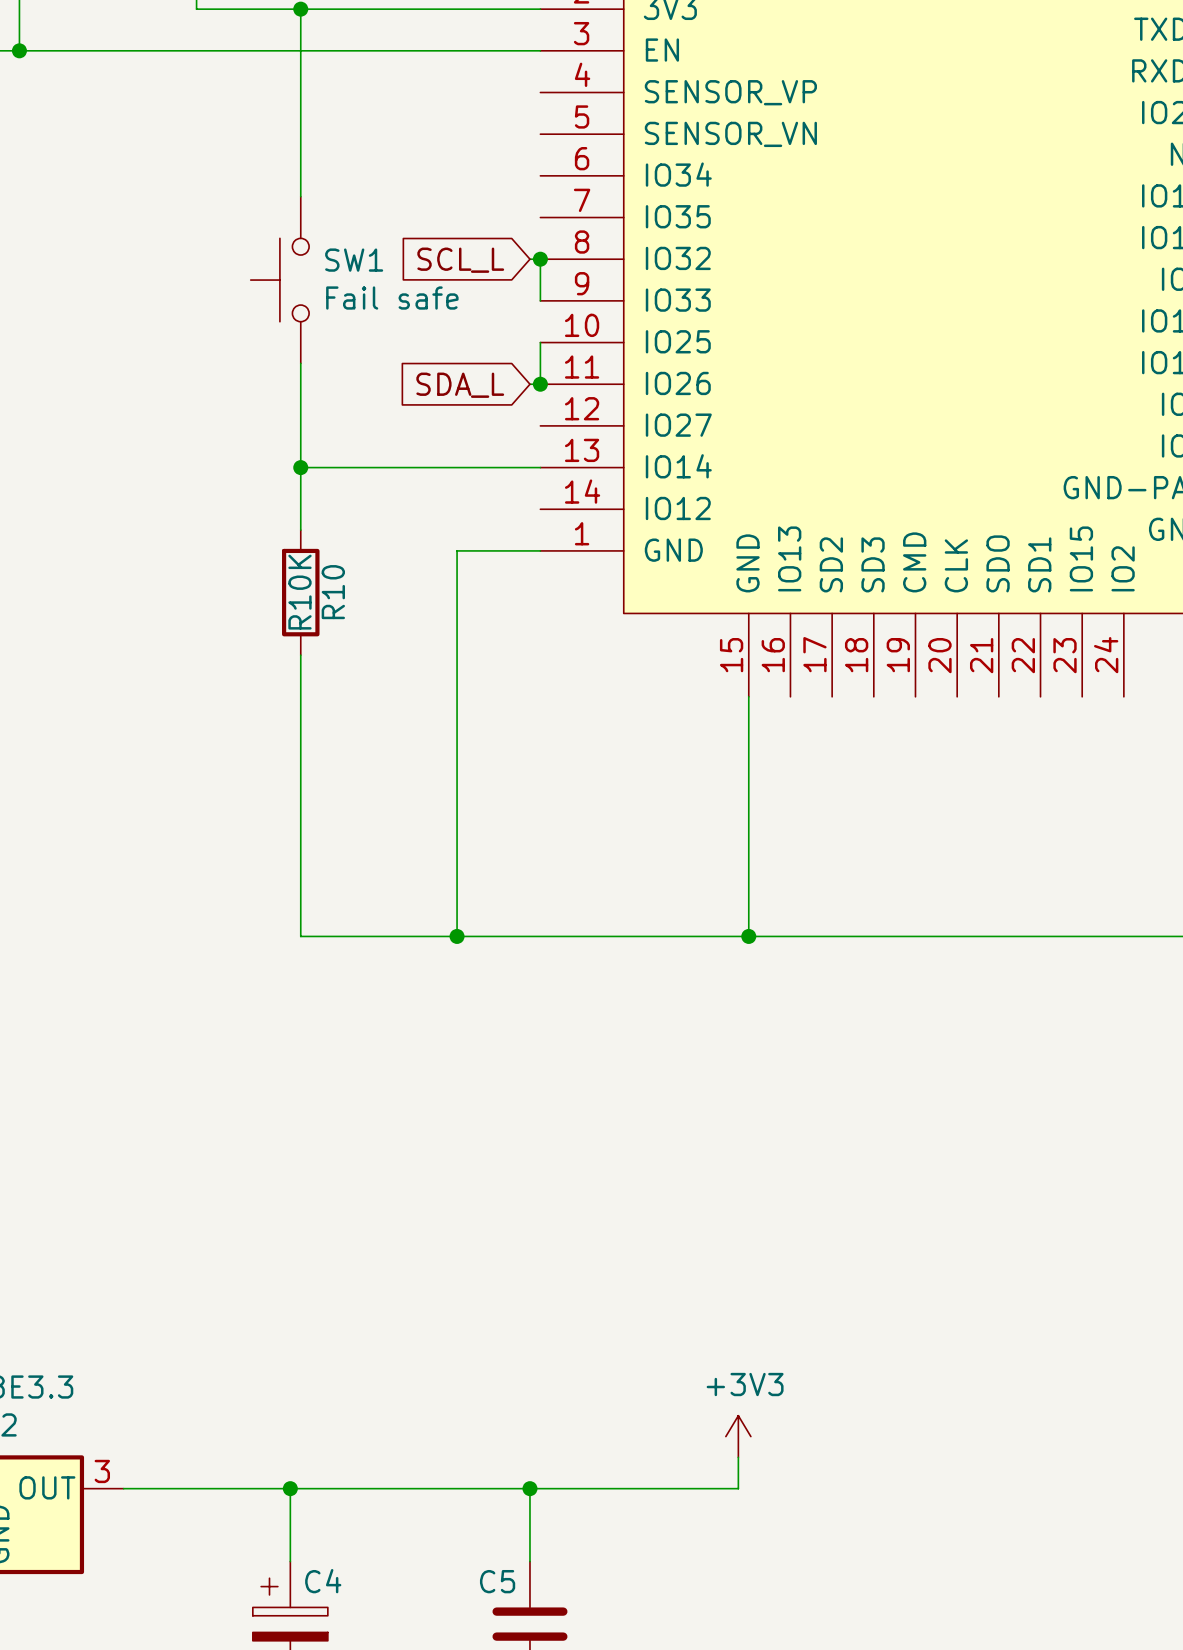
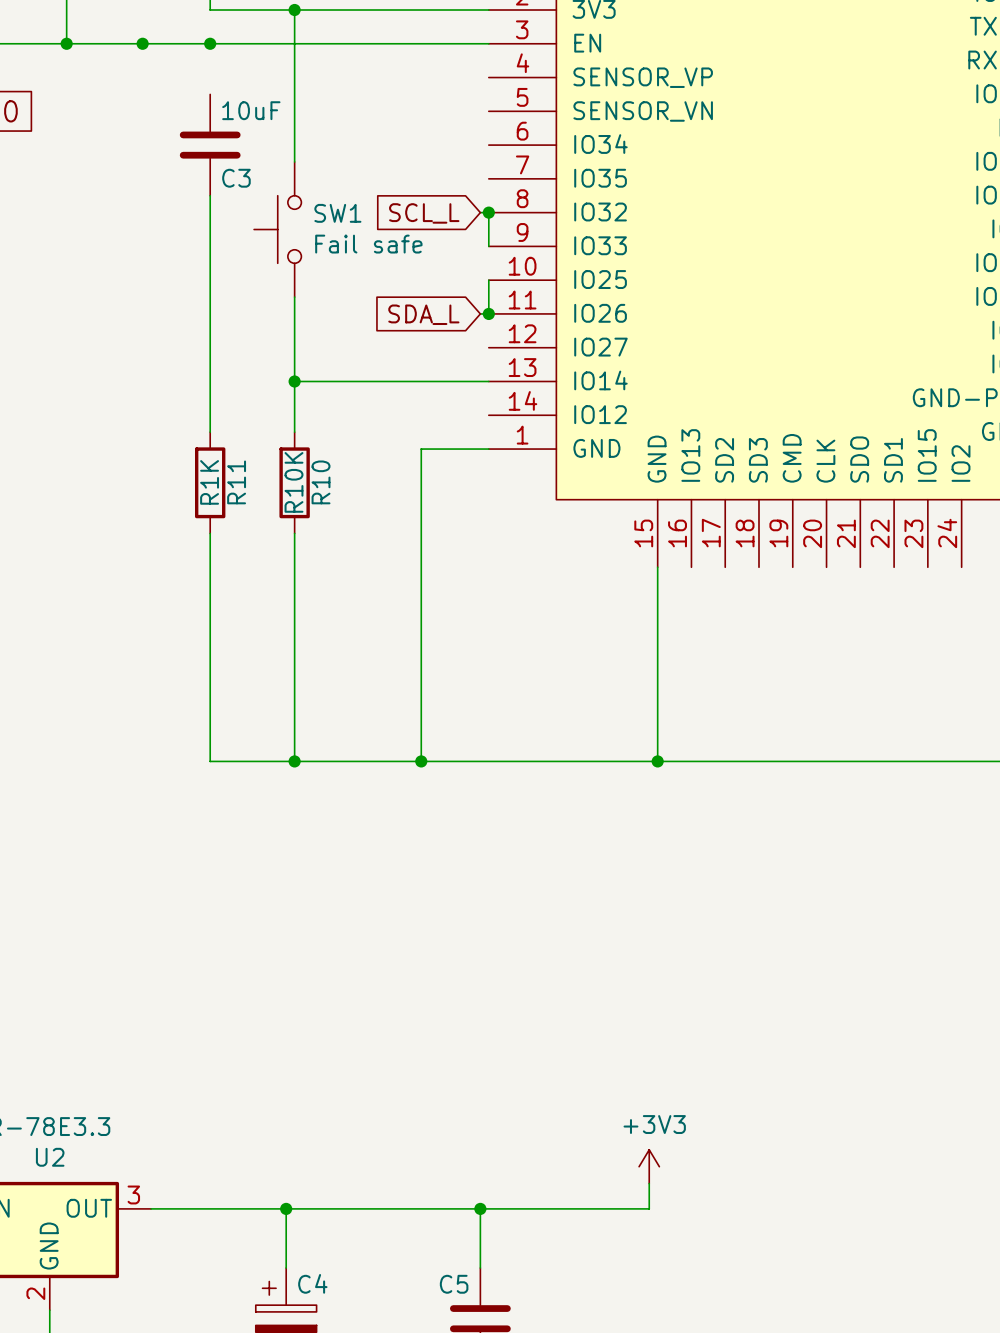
junction: none -> (142, 43)
junction: none -> (210, 43)
C3: none -> 10uF (210, 145)
wire: none -> (210, 195) (210, 432)
R11: none -> R1K (210, 482)
wire: none -> (210, 533) (210, 761) (294, 761)
junction: none -> (294, 761)

